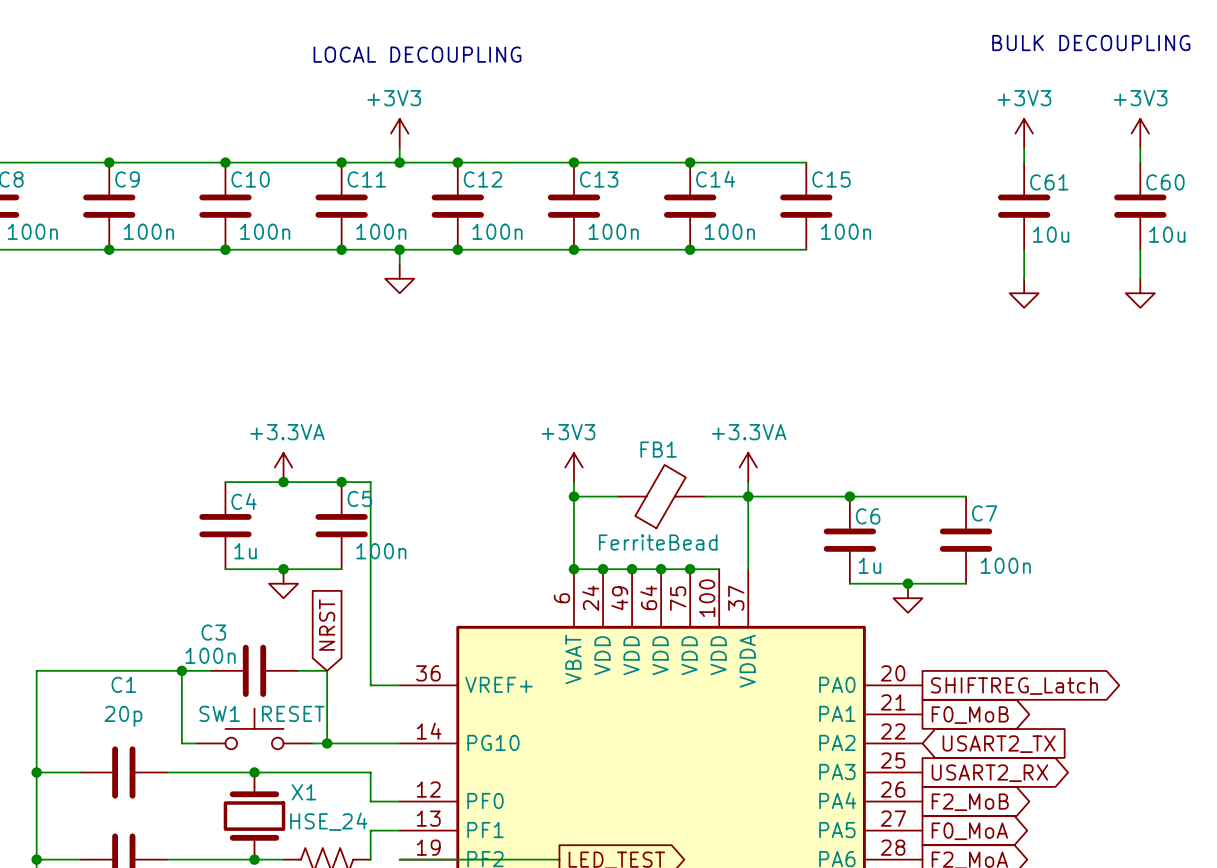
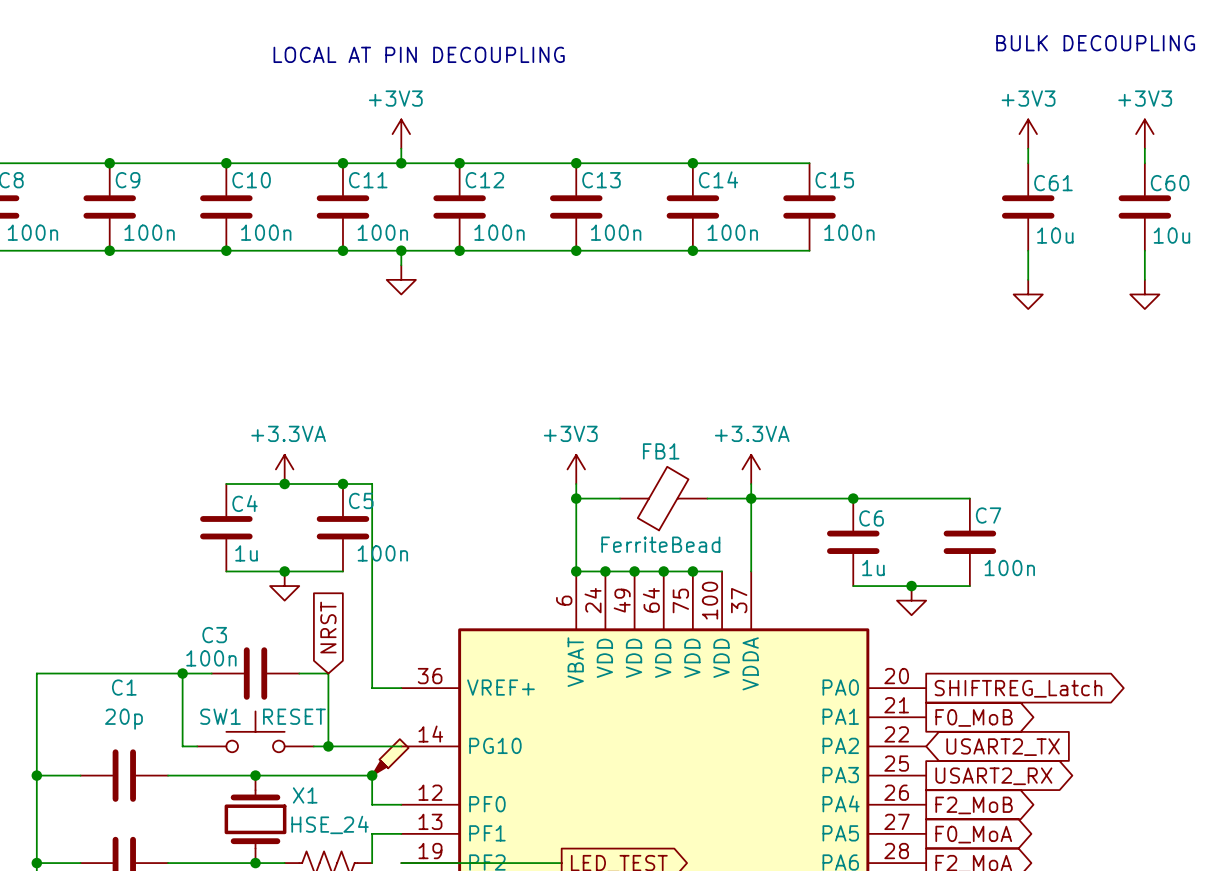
text: LOCAL DECOUPLING (417, 54) -> LOCAL AT PIN DECOUPLING (419, 54)
part: none -> (390, 757)
junction: none -> (372, 775)

